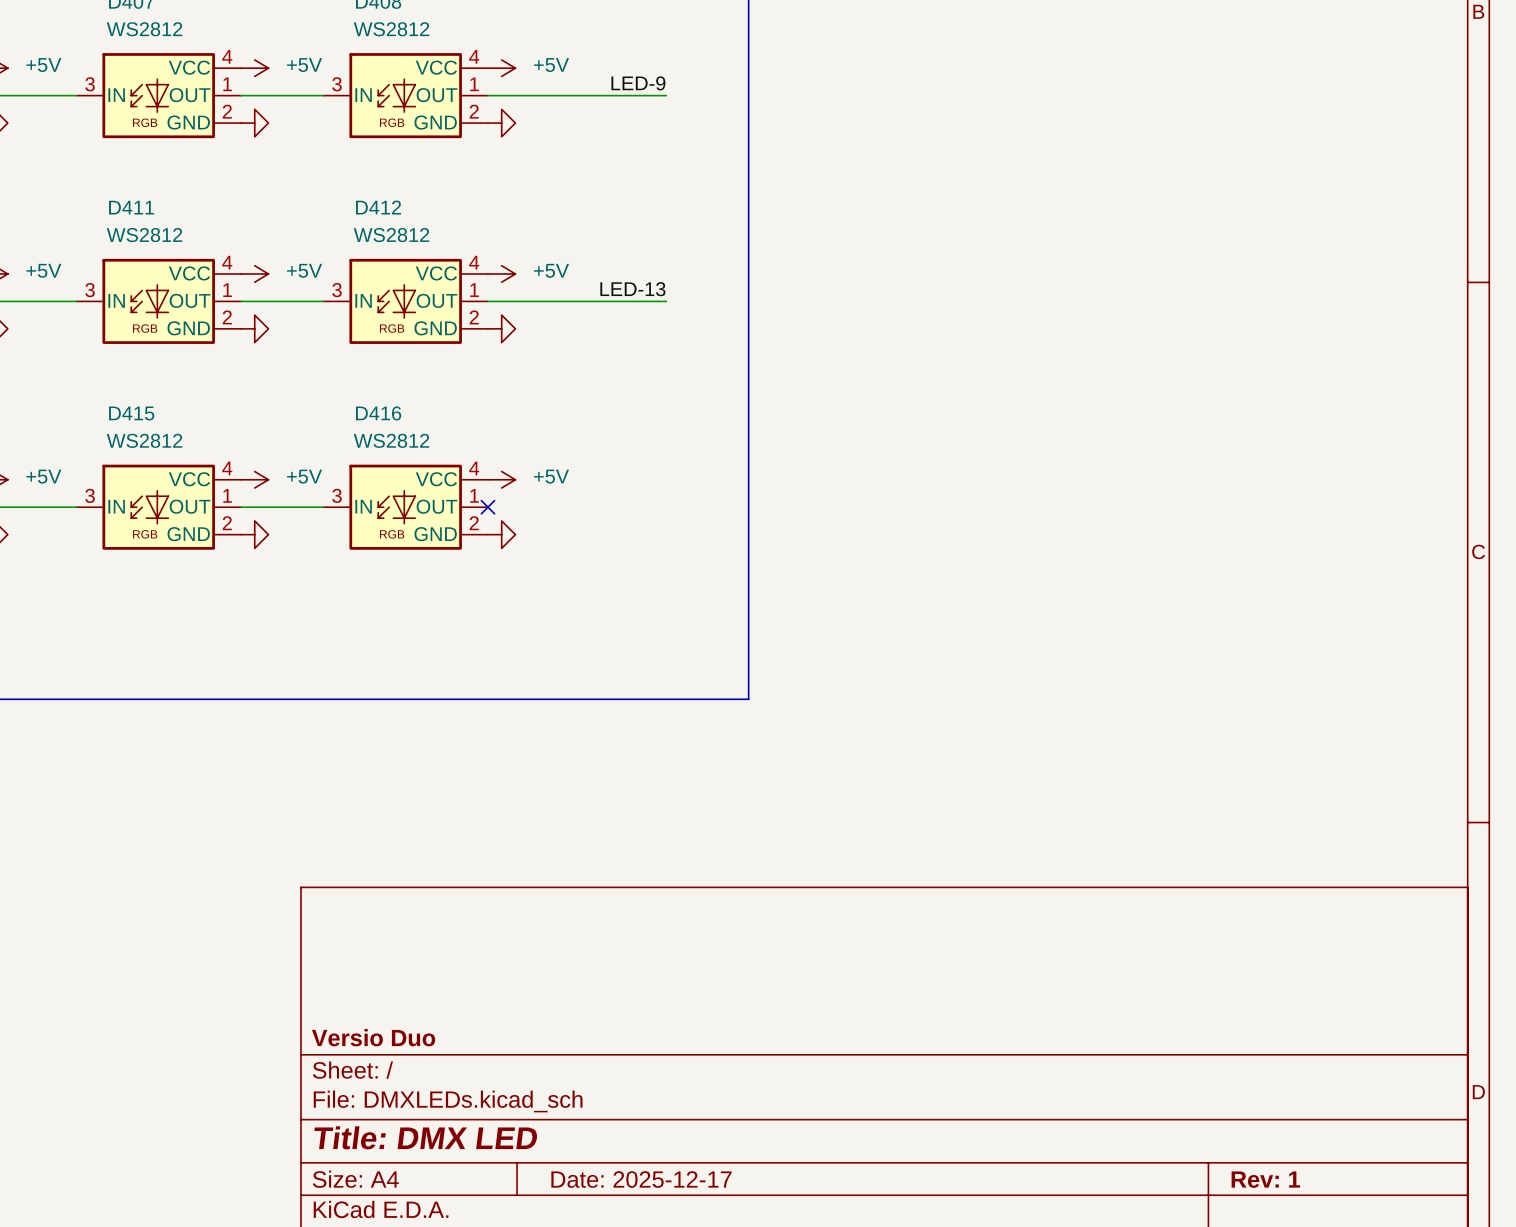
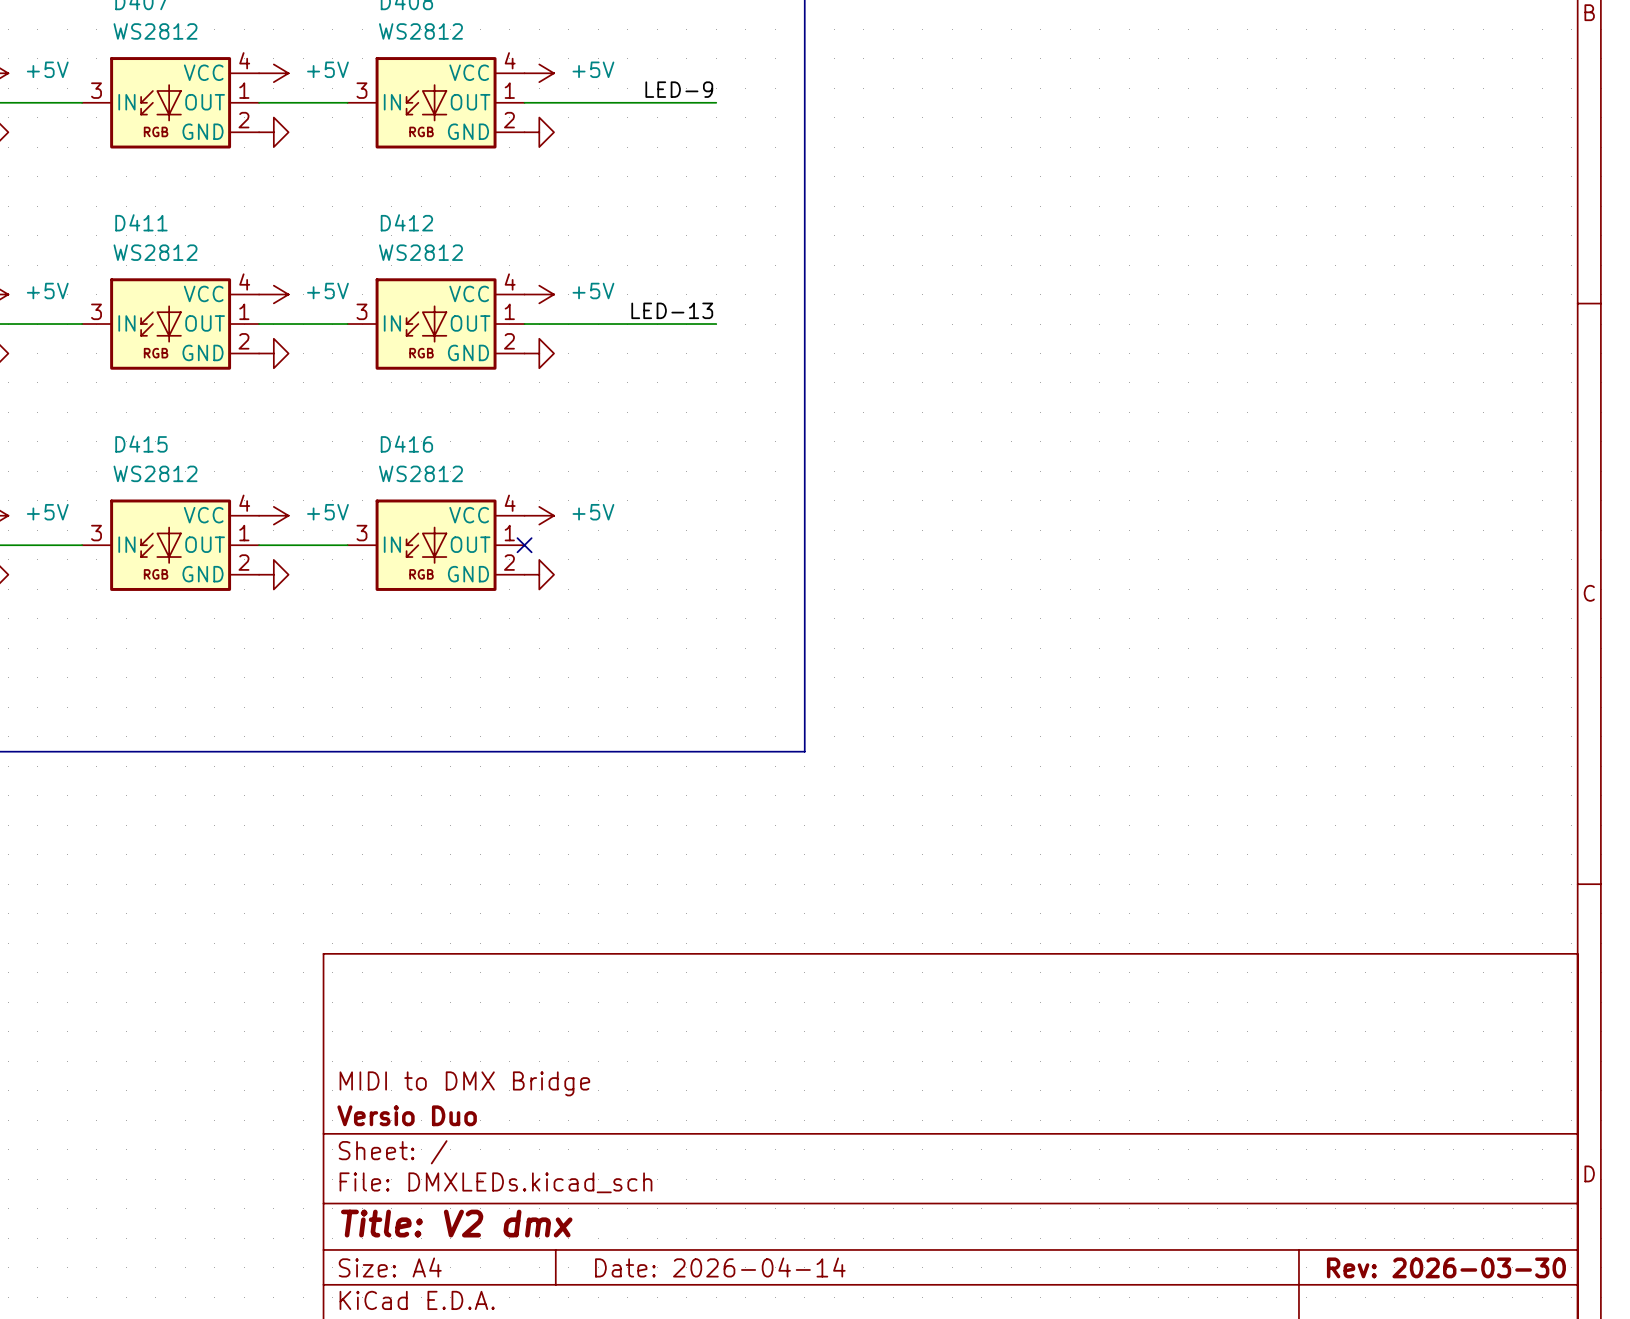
title block: none -> MIDI to DMX Bridge (464, 1083)
title block: Title: DMX LED (425, 1137) -> Title: V2 dmx (456, 1223)
title block: Date: 2025-12-17 (641, 1179) -> Date: 2026-04-14 (720, 1267)
title block: Rev: 1 (1265, 1179) -> Rev: 2026-03-30 (1446, 1267)

